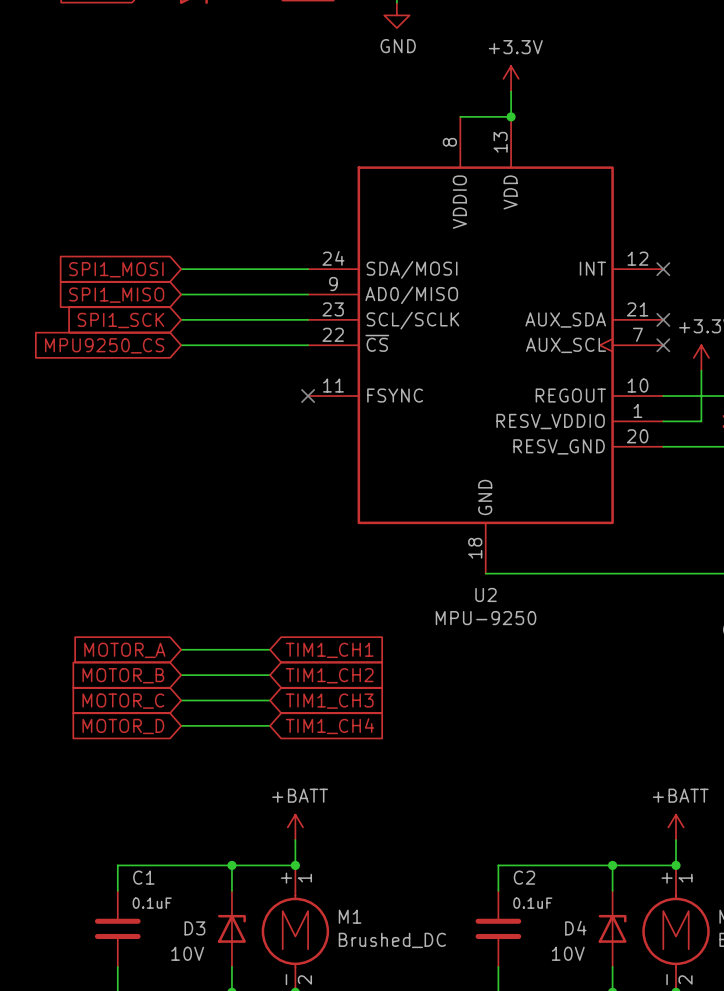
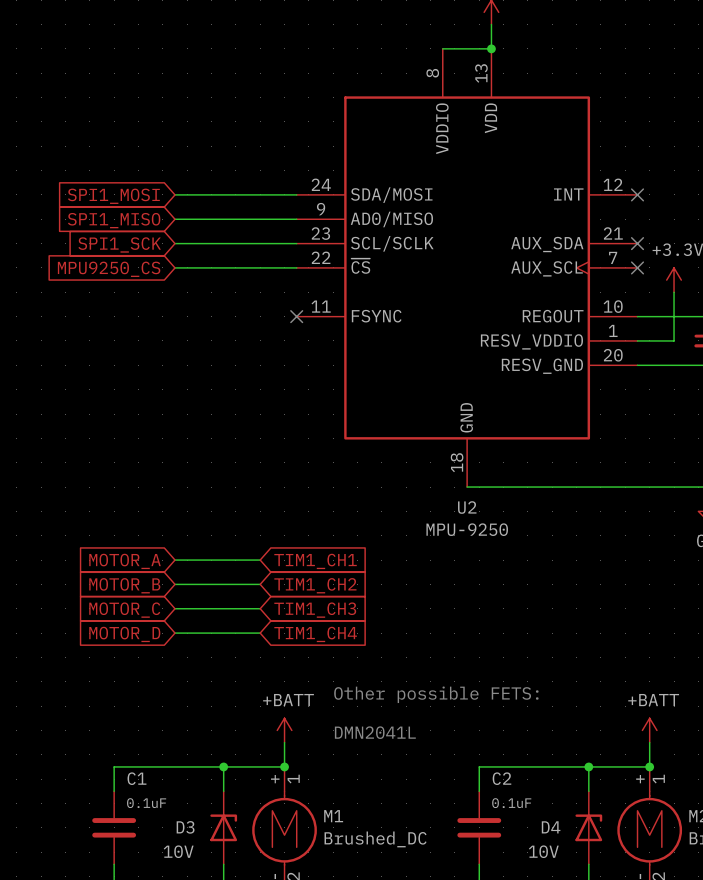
text: none -> Other possible FETS: (436, 694)
text: none -> DMN2041L (375, 732)

